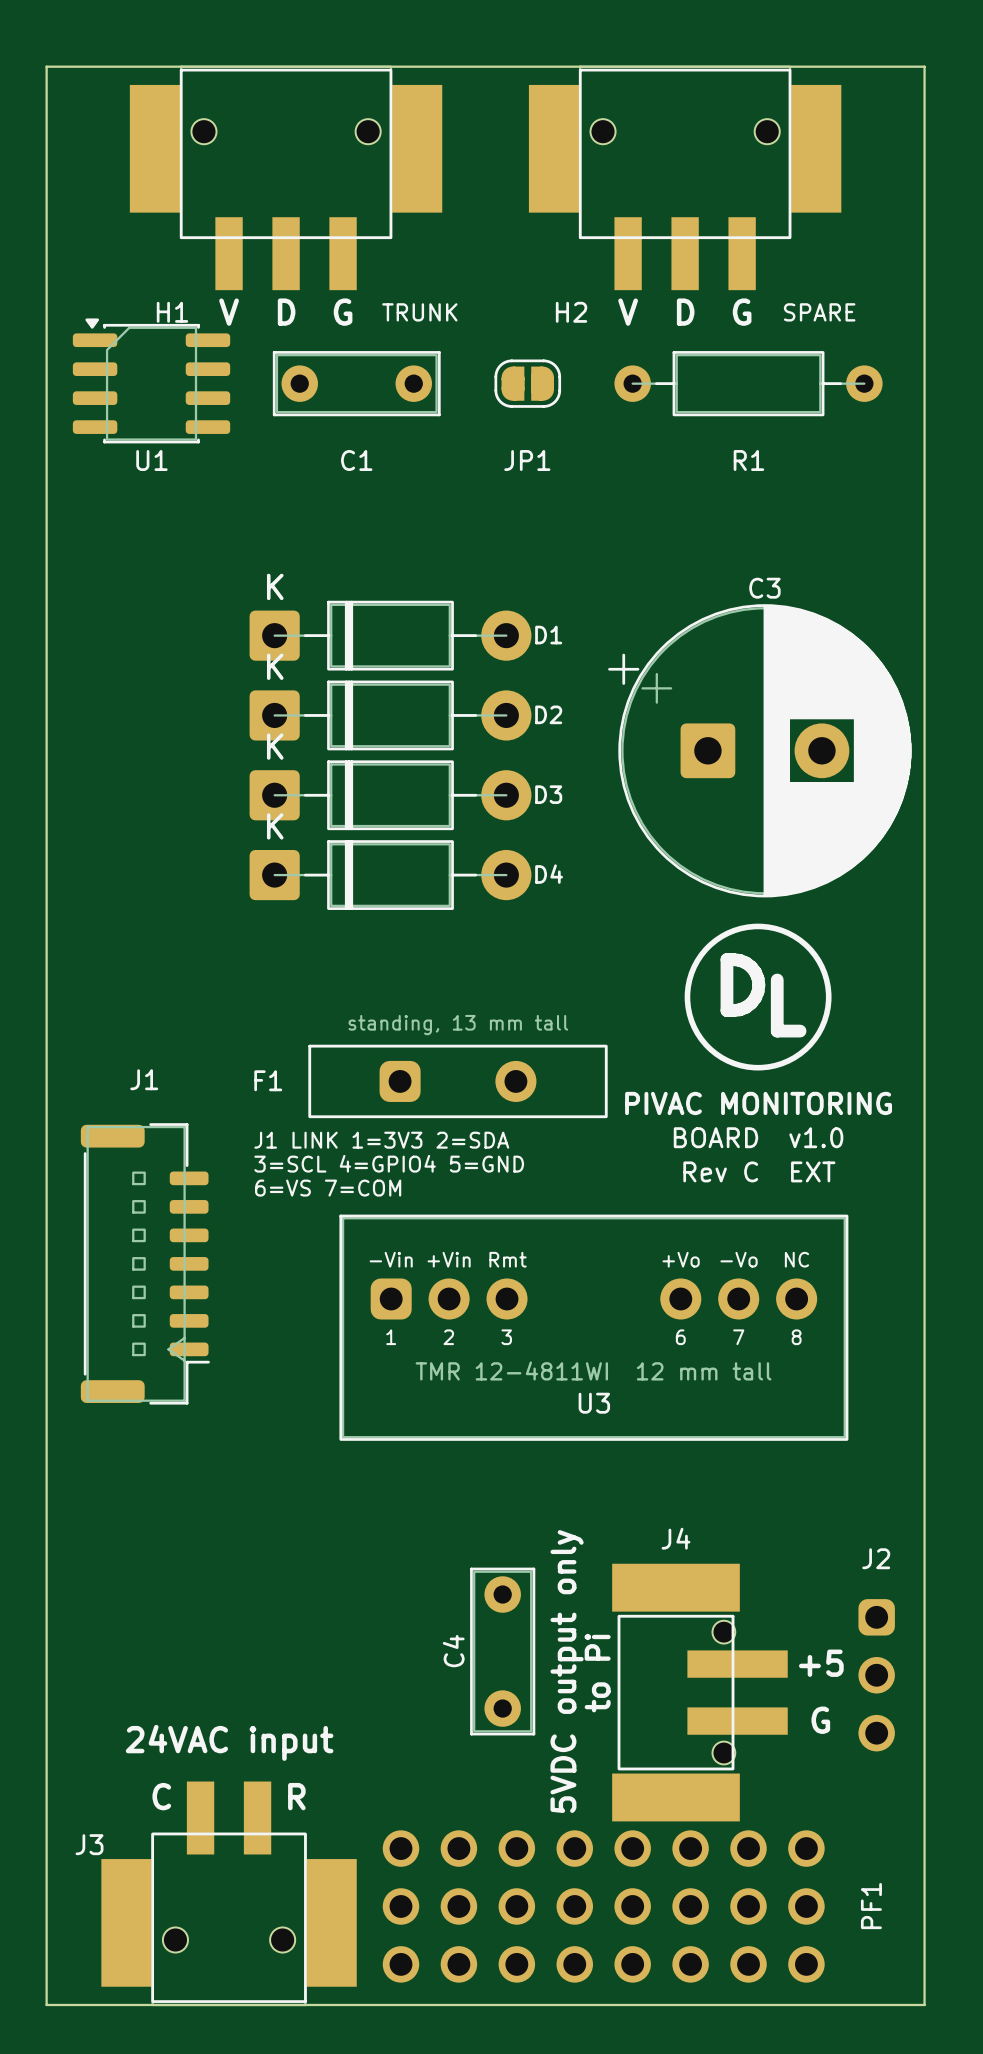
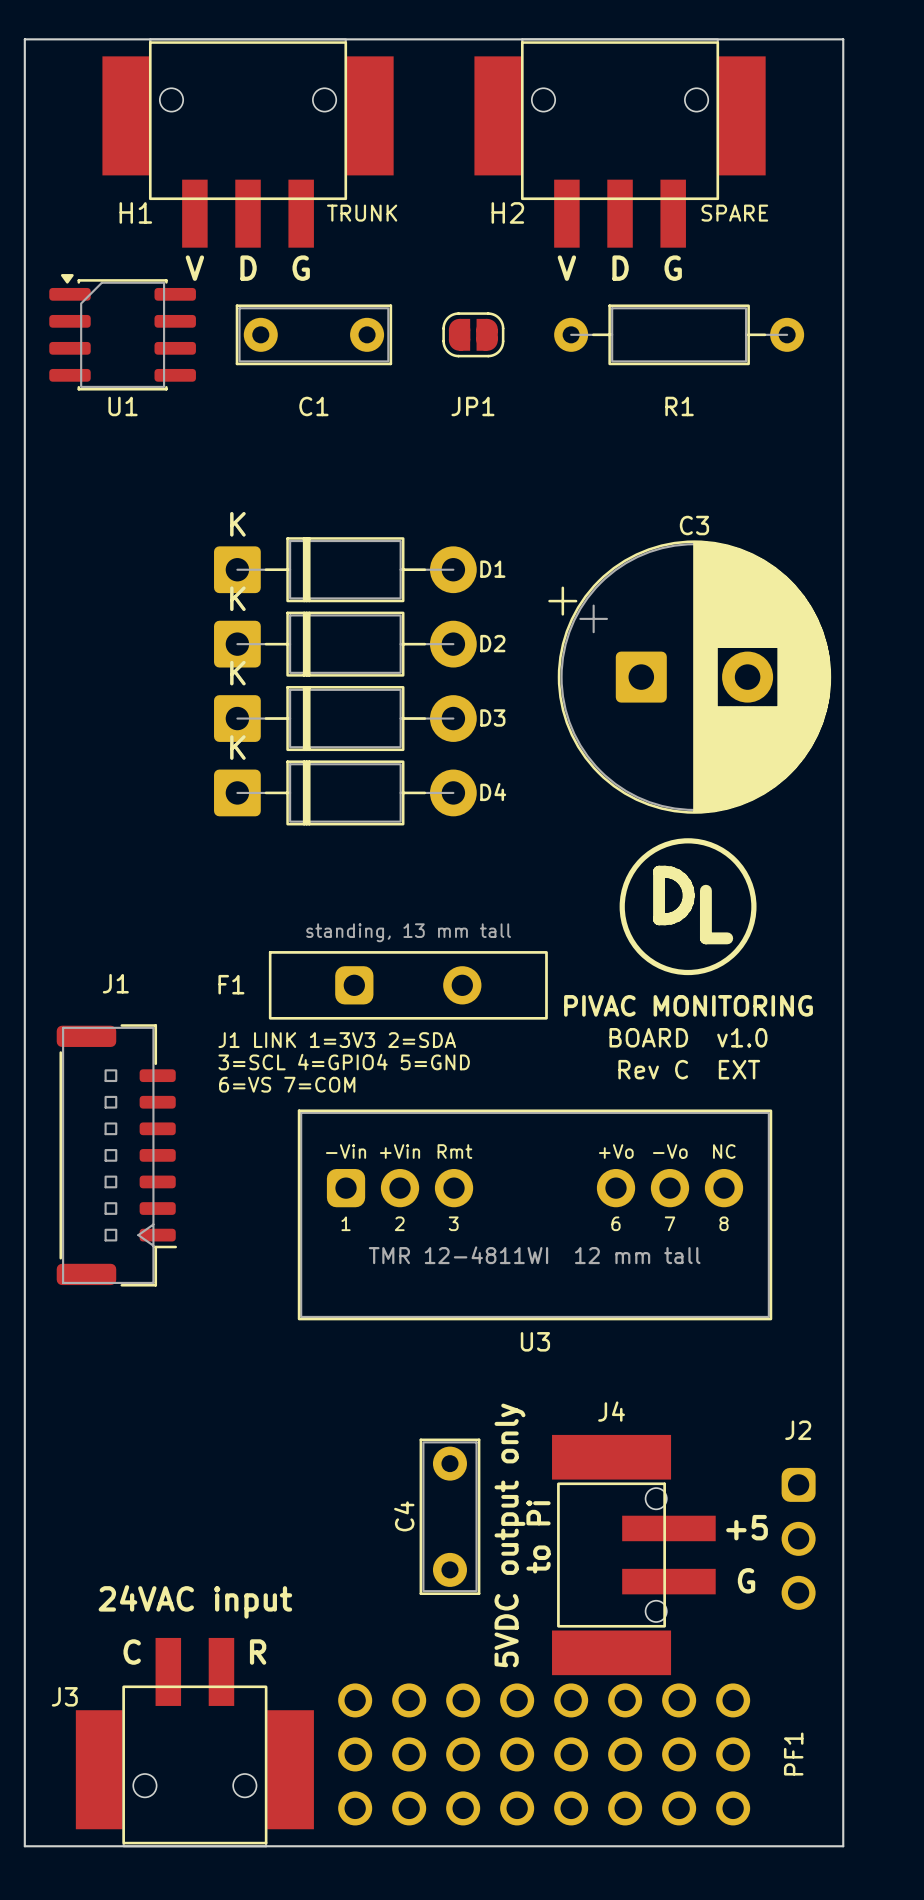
H1 name position: H1 (172, 312) -> H1 (135, 212)
text position: TRUNK (419, 312) -> TRUNK (362, 213)
H2 name position: H2 (571, 312) -> H2 (507, 212)
text position: SPARE (819, 312) -> SPARE (734, 213)
U3 name position: U3 (594, 1403) -> U3 (535, 1341)

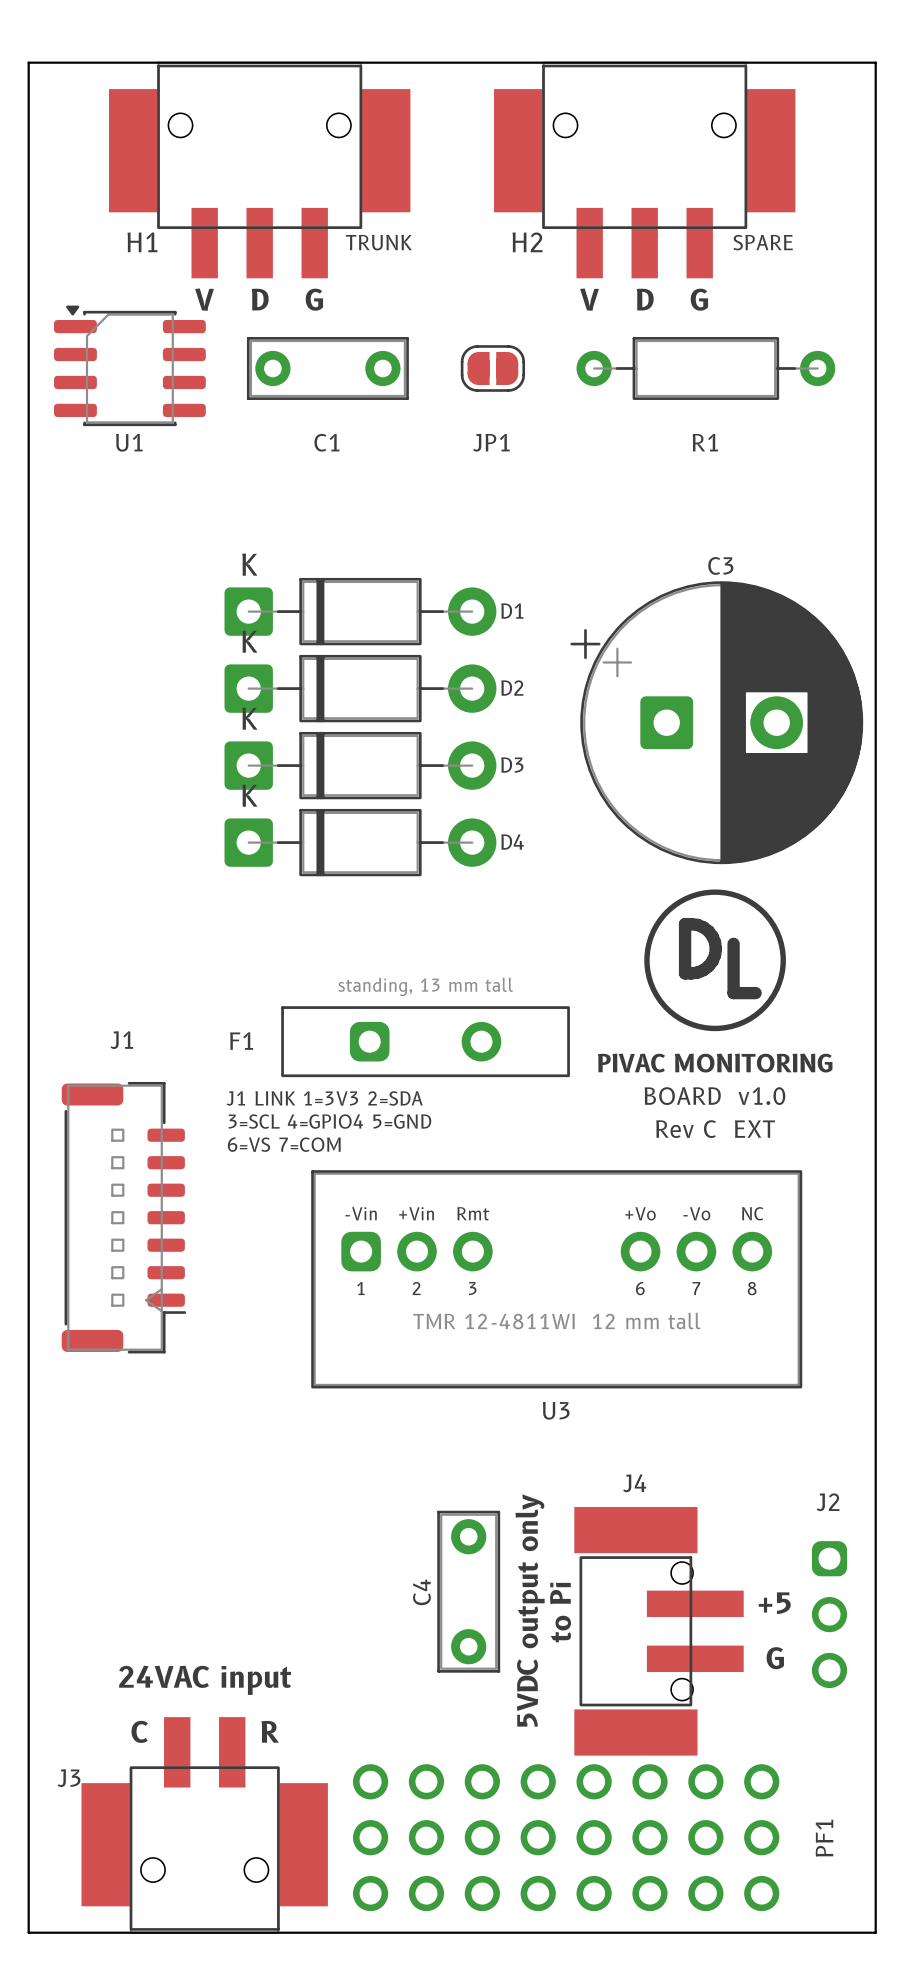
H1 footprint: [102, 38, 394, 248] -> [109, 61, 411, 279]
H2 footprint: [474, 38, 766, 248] -> [494, 61, 796, 279]
J3 footprint: [75, 1637, 314, 1848] -> [81, 1717, 328, 1934]

